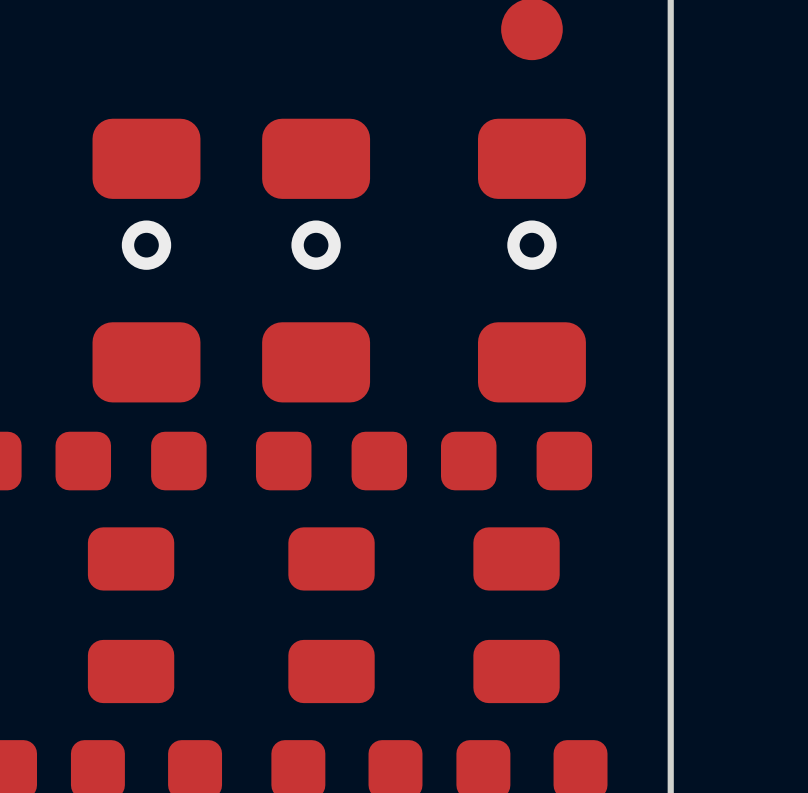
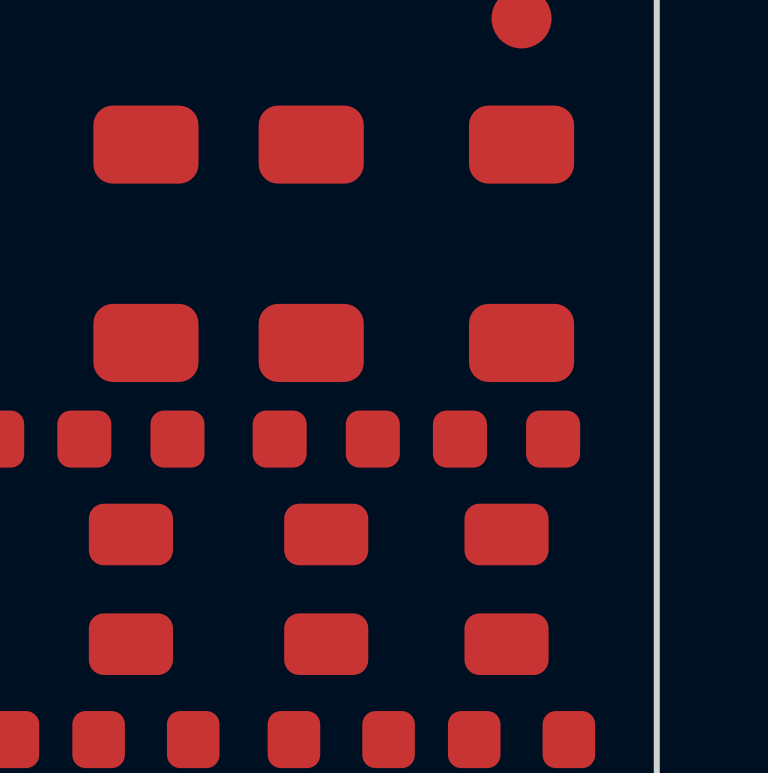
via: (146, 245) -> none
via: (316, 245) -> none
via: (531, 245) -> none

